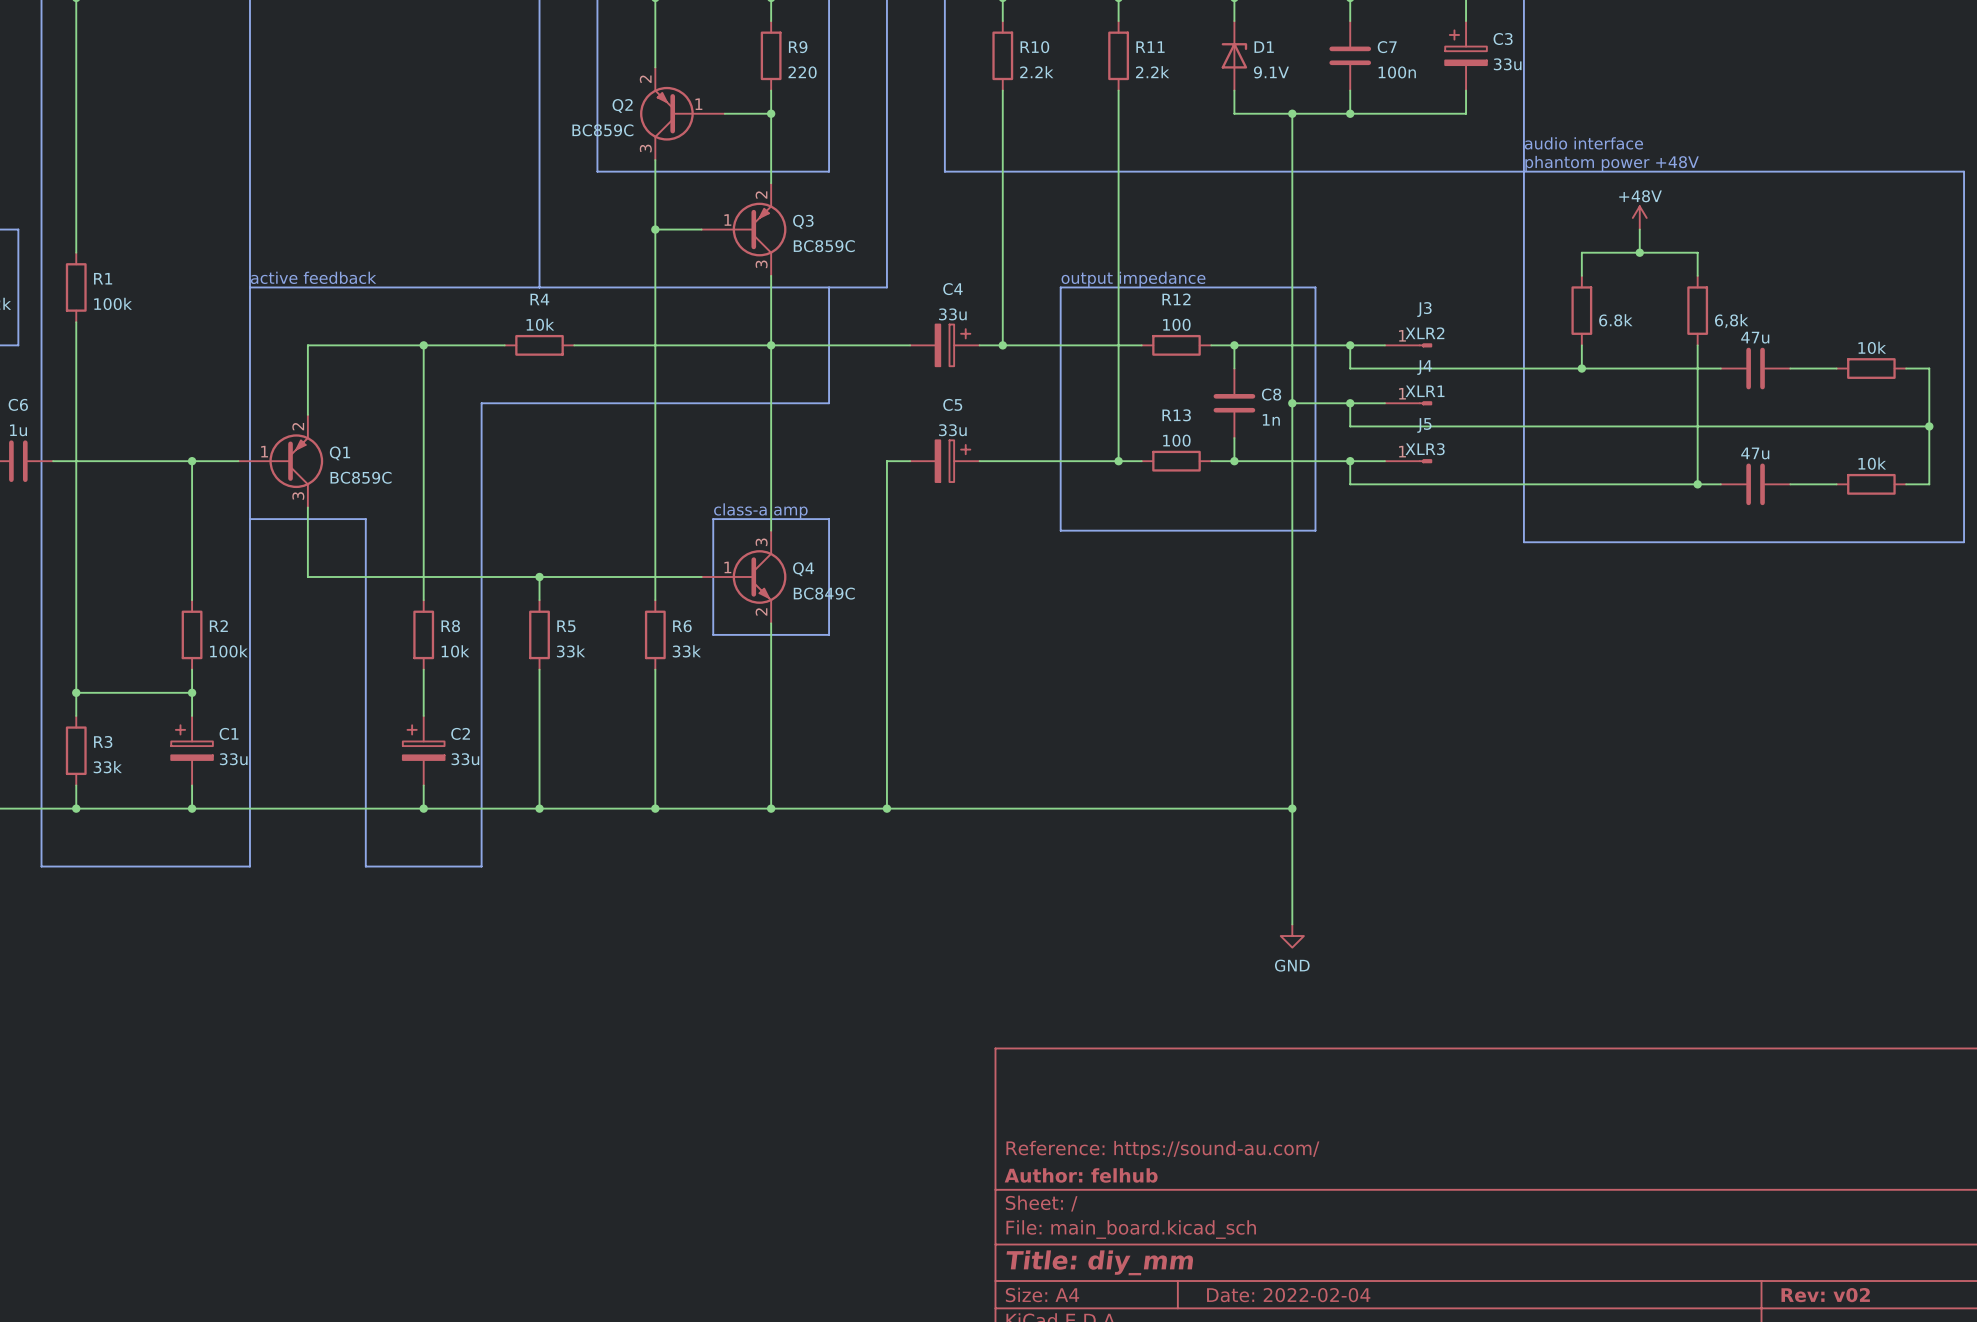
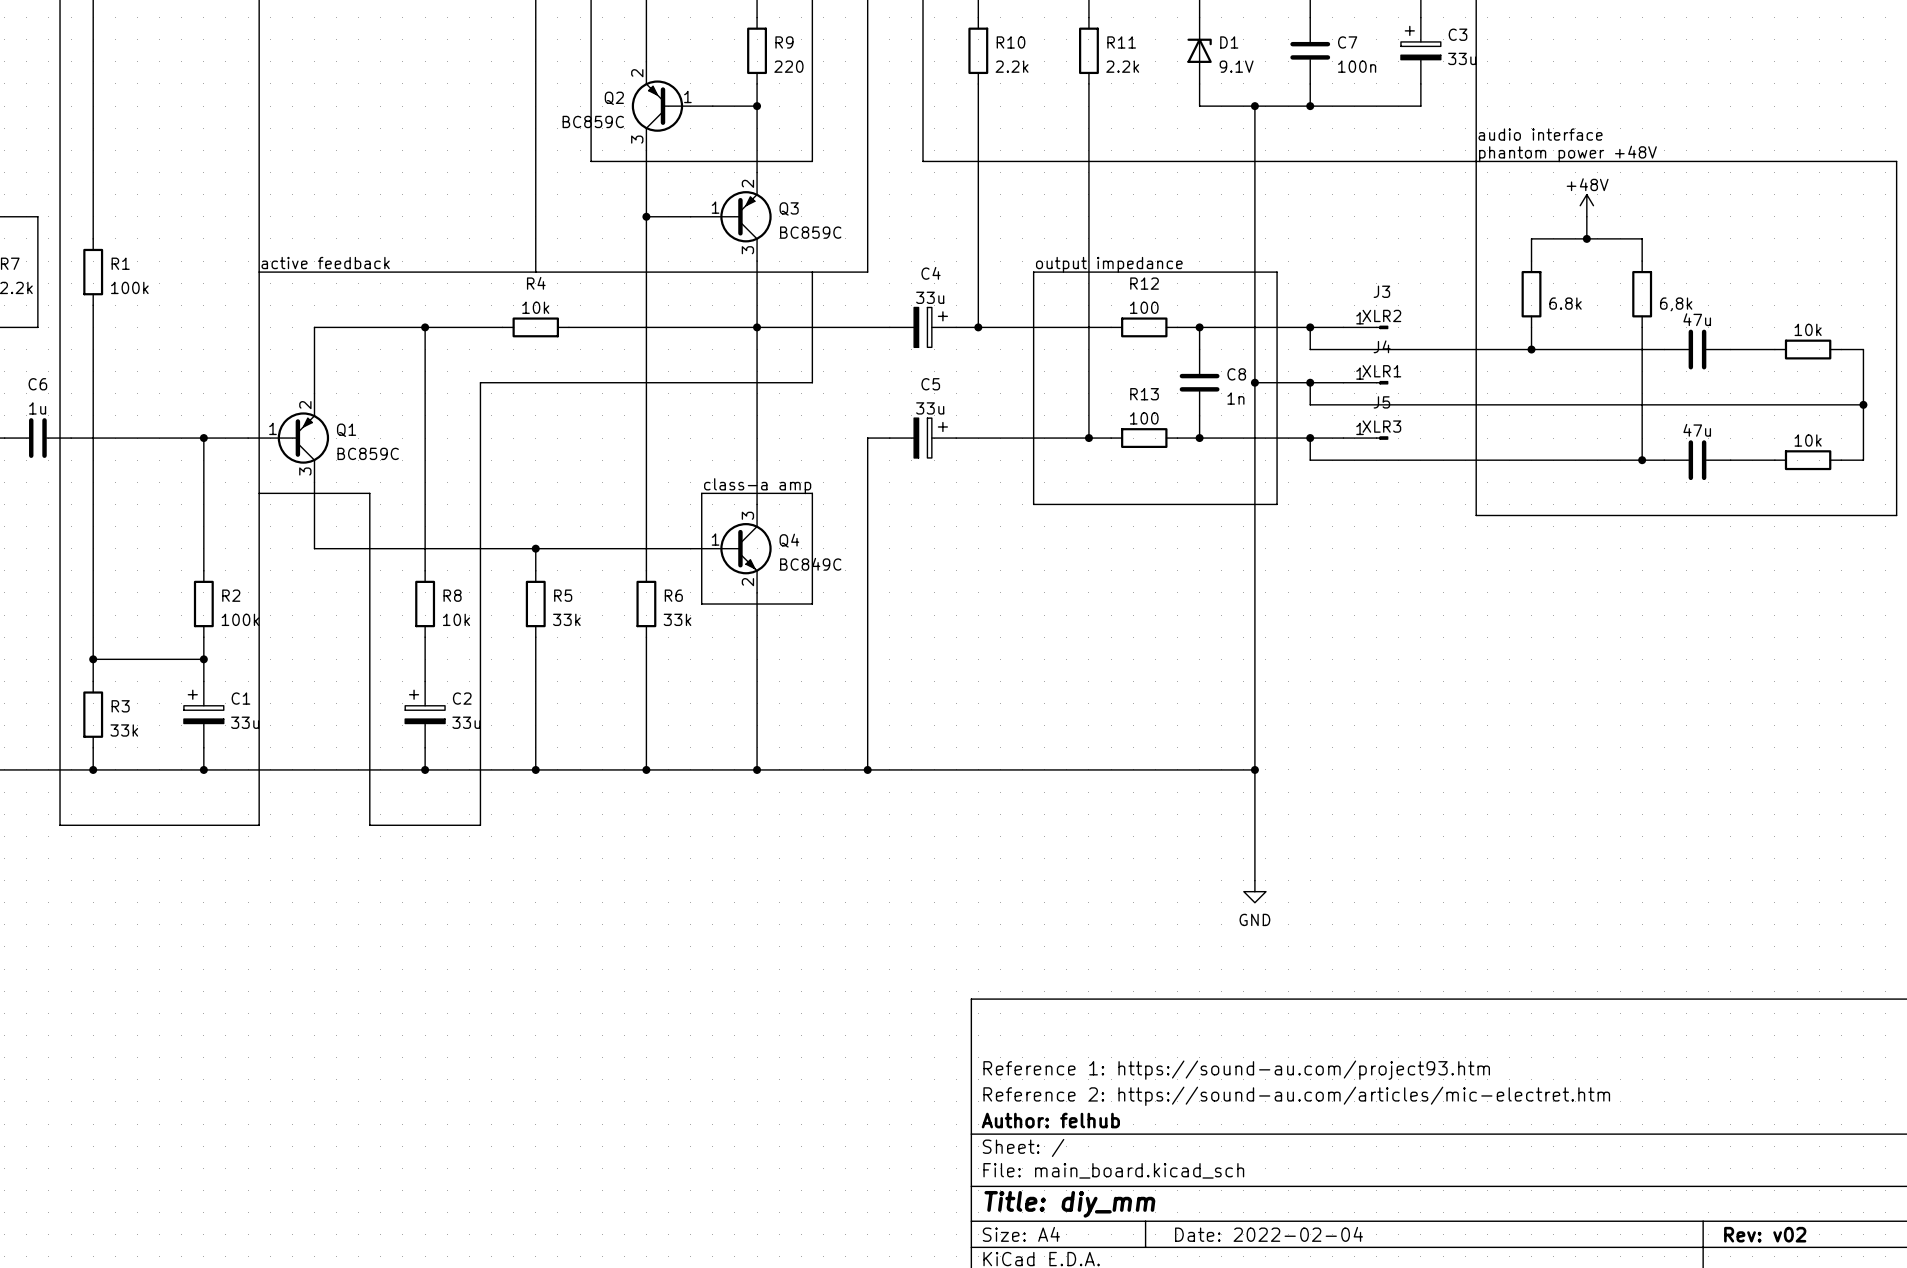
title block: none -> Reference 1: https://sound-au.com/project93.htm (1236, 1070)
title block: Reference: https://sound-au.com/ (1162, 1149) -> Reference 2: https://sound-au.com/articles/mic-electret.htm (1296, 1096)

